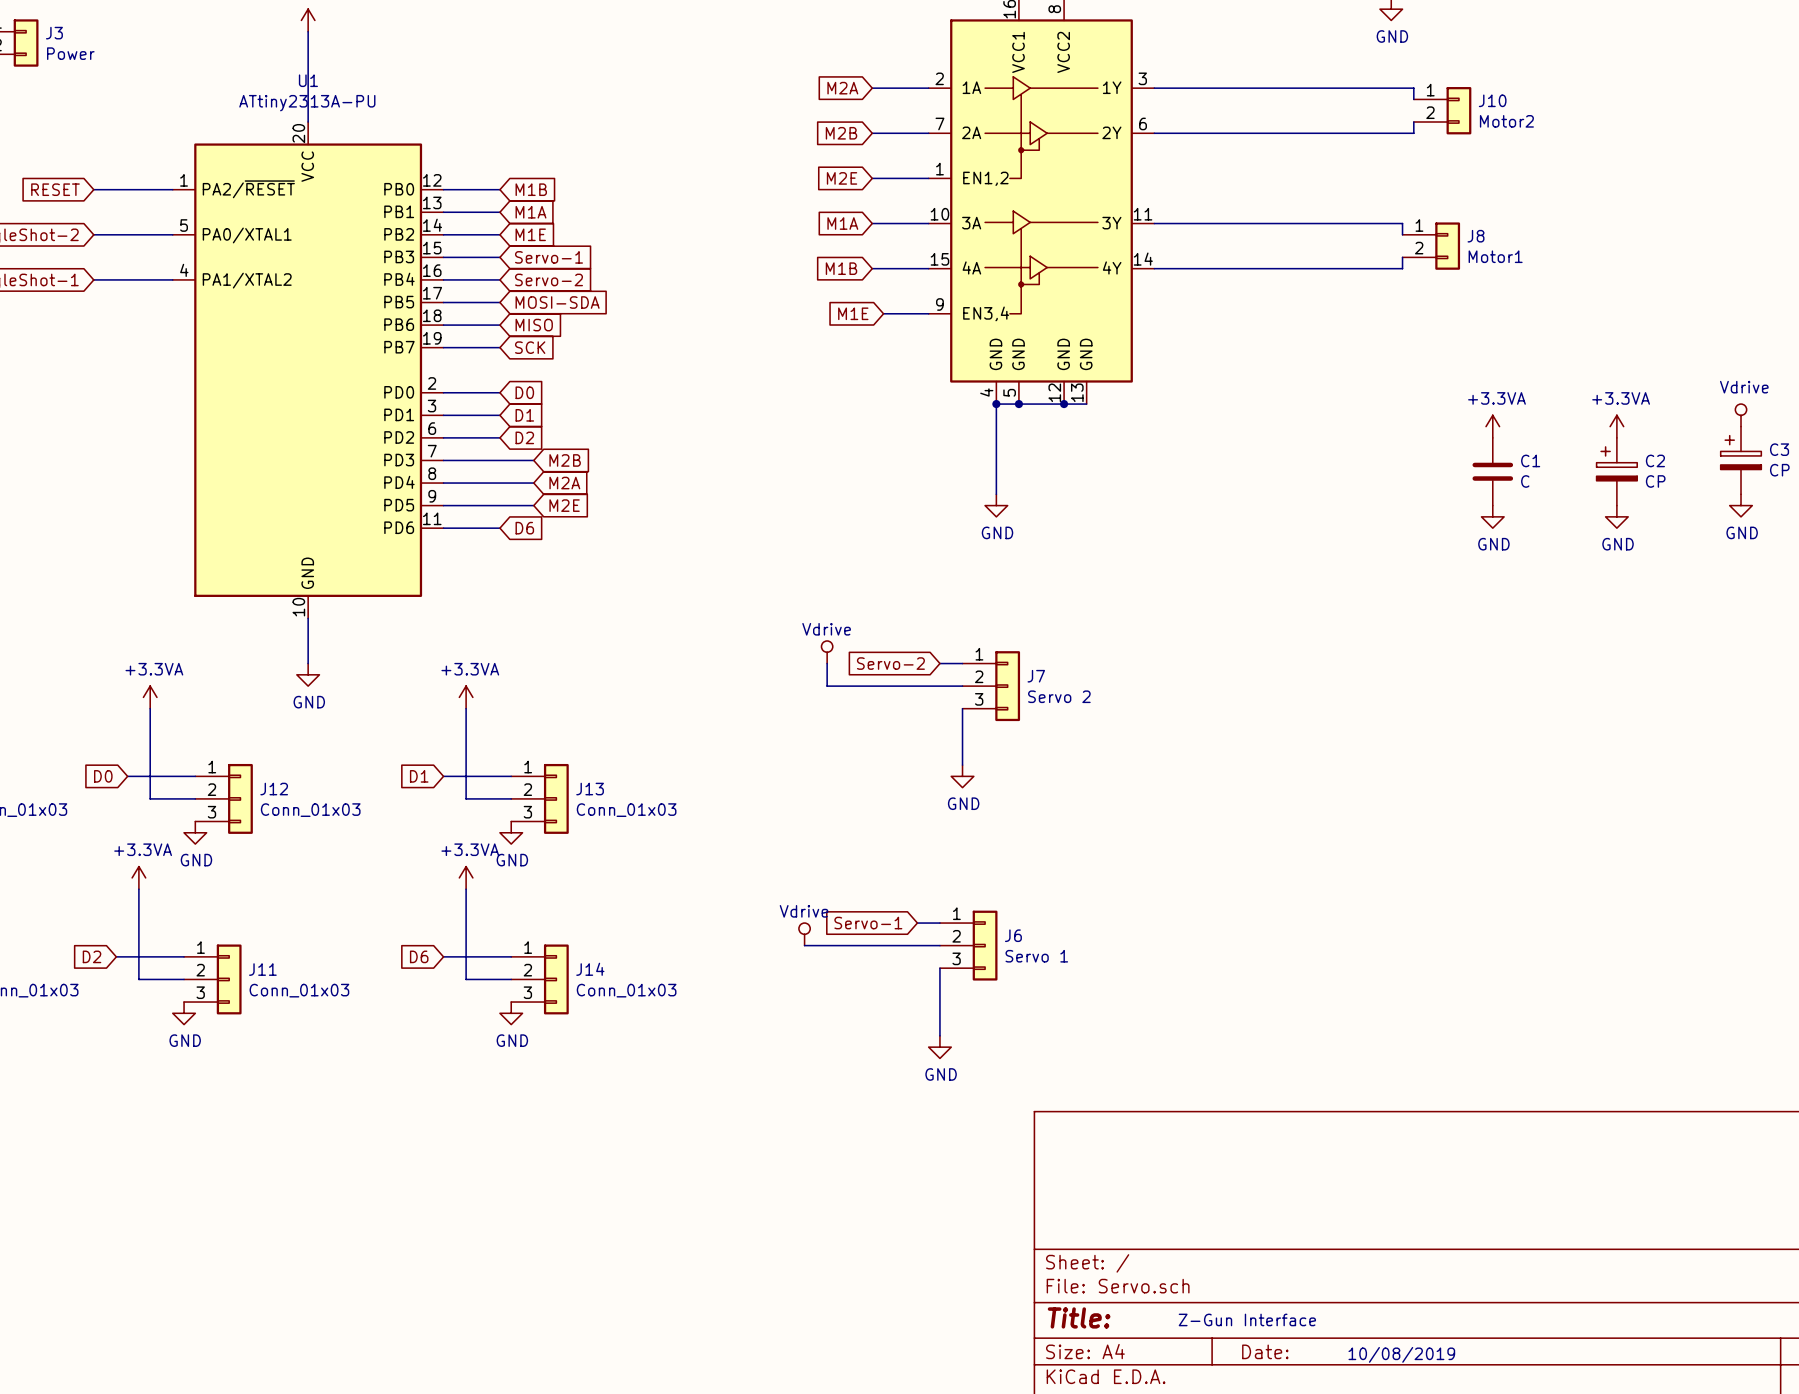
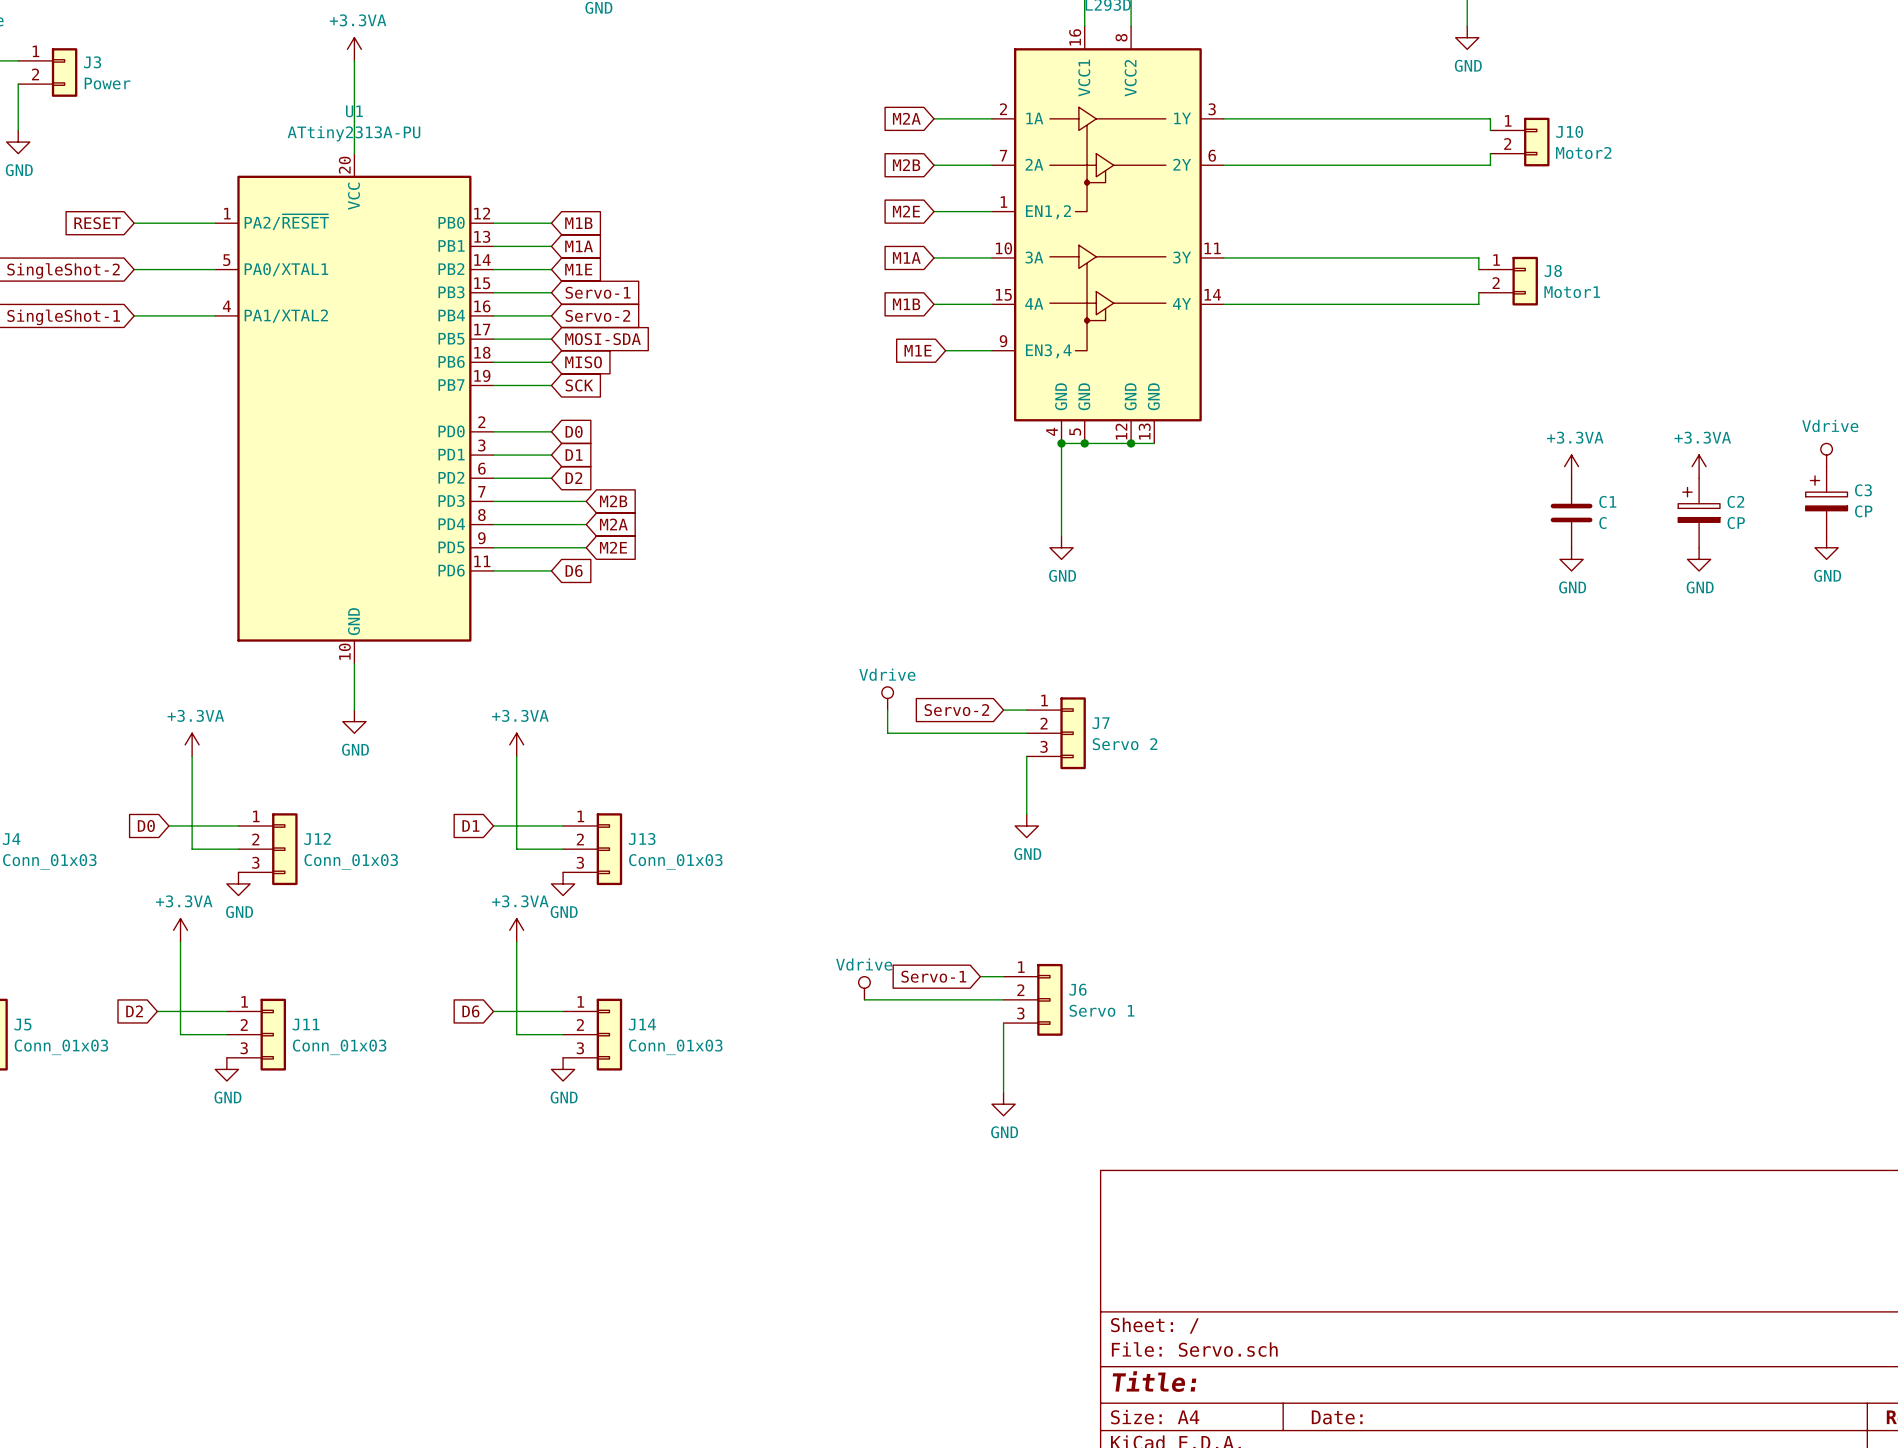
text: Z-Gun Interface (1247, 1319) -> none
text: 10/08/2019 (1401, 1354) -> none

